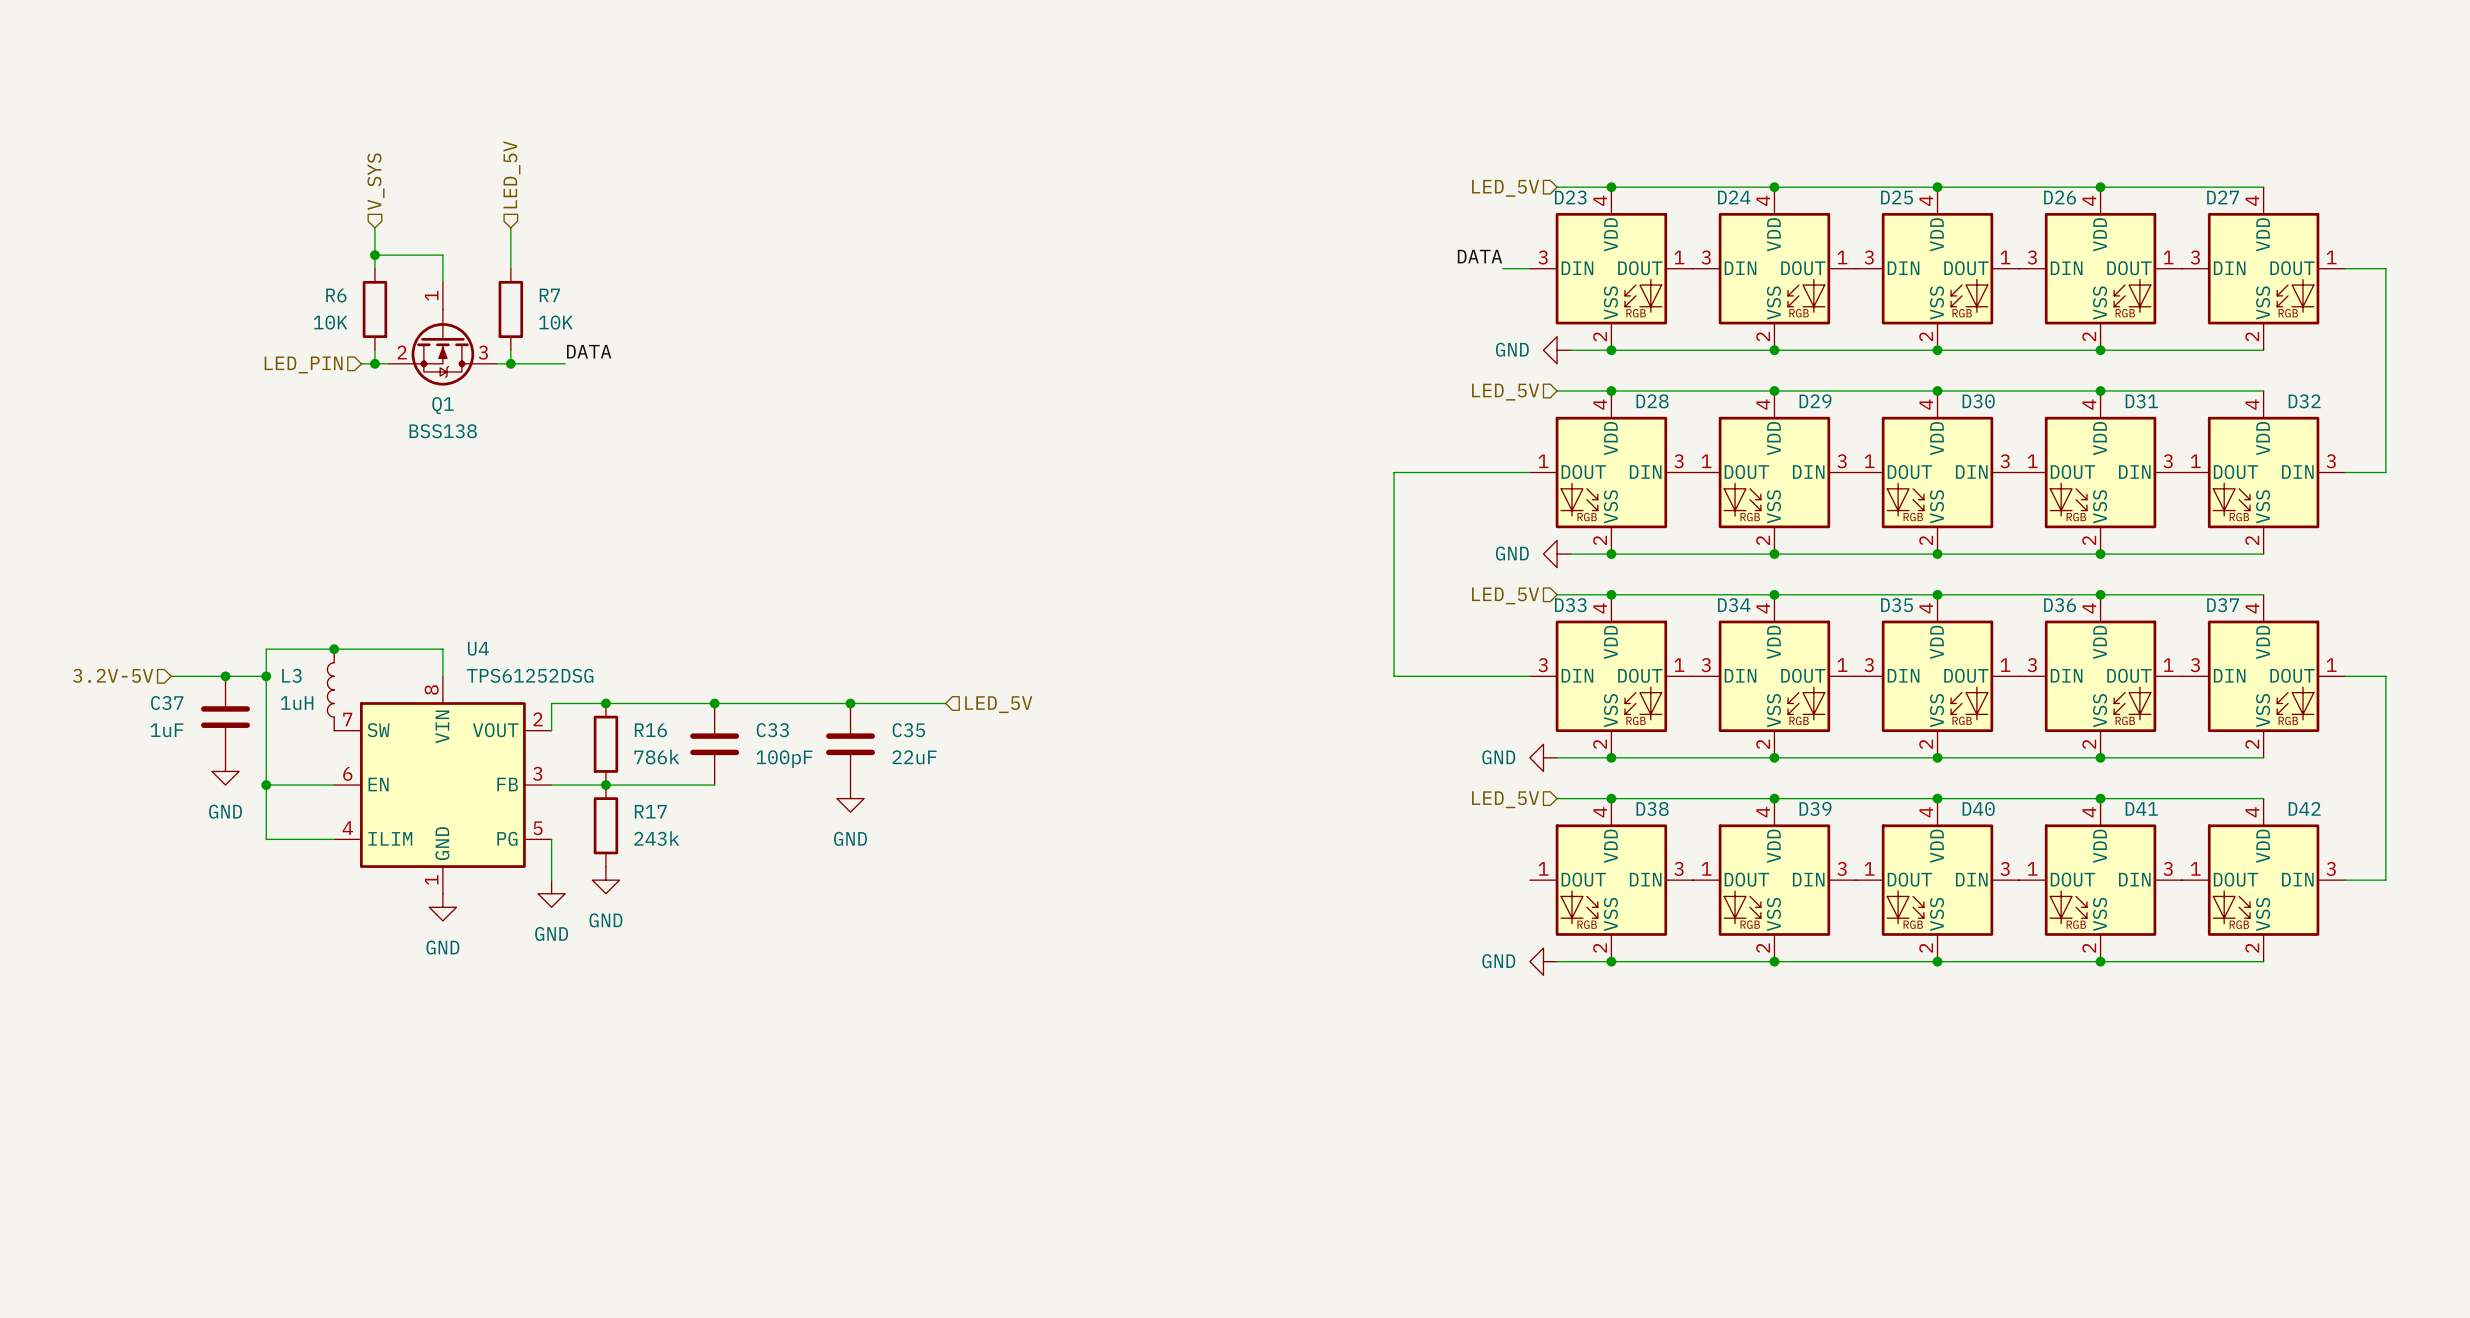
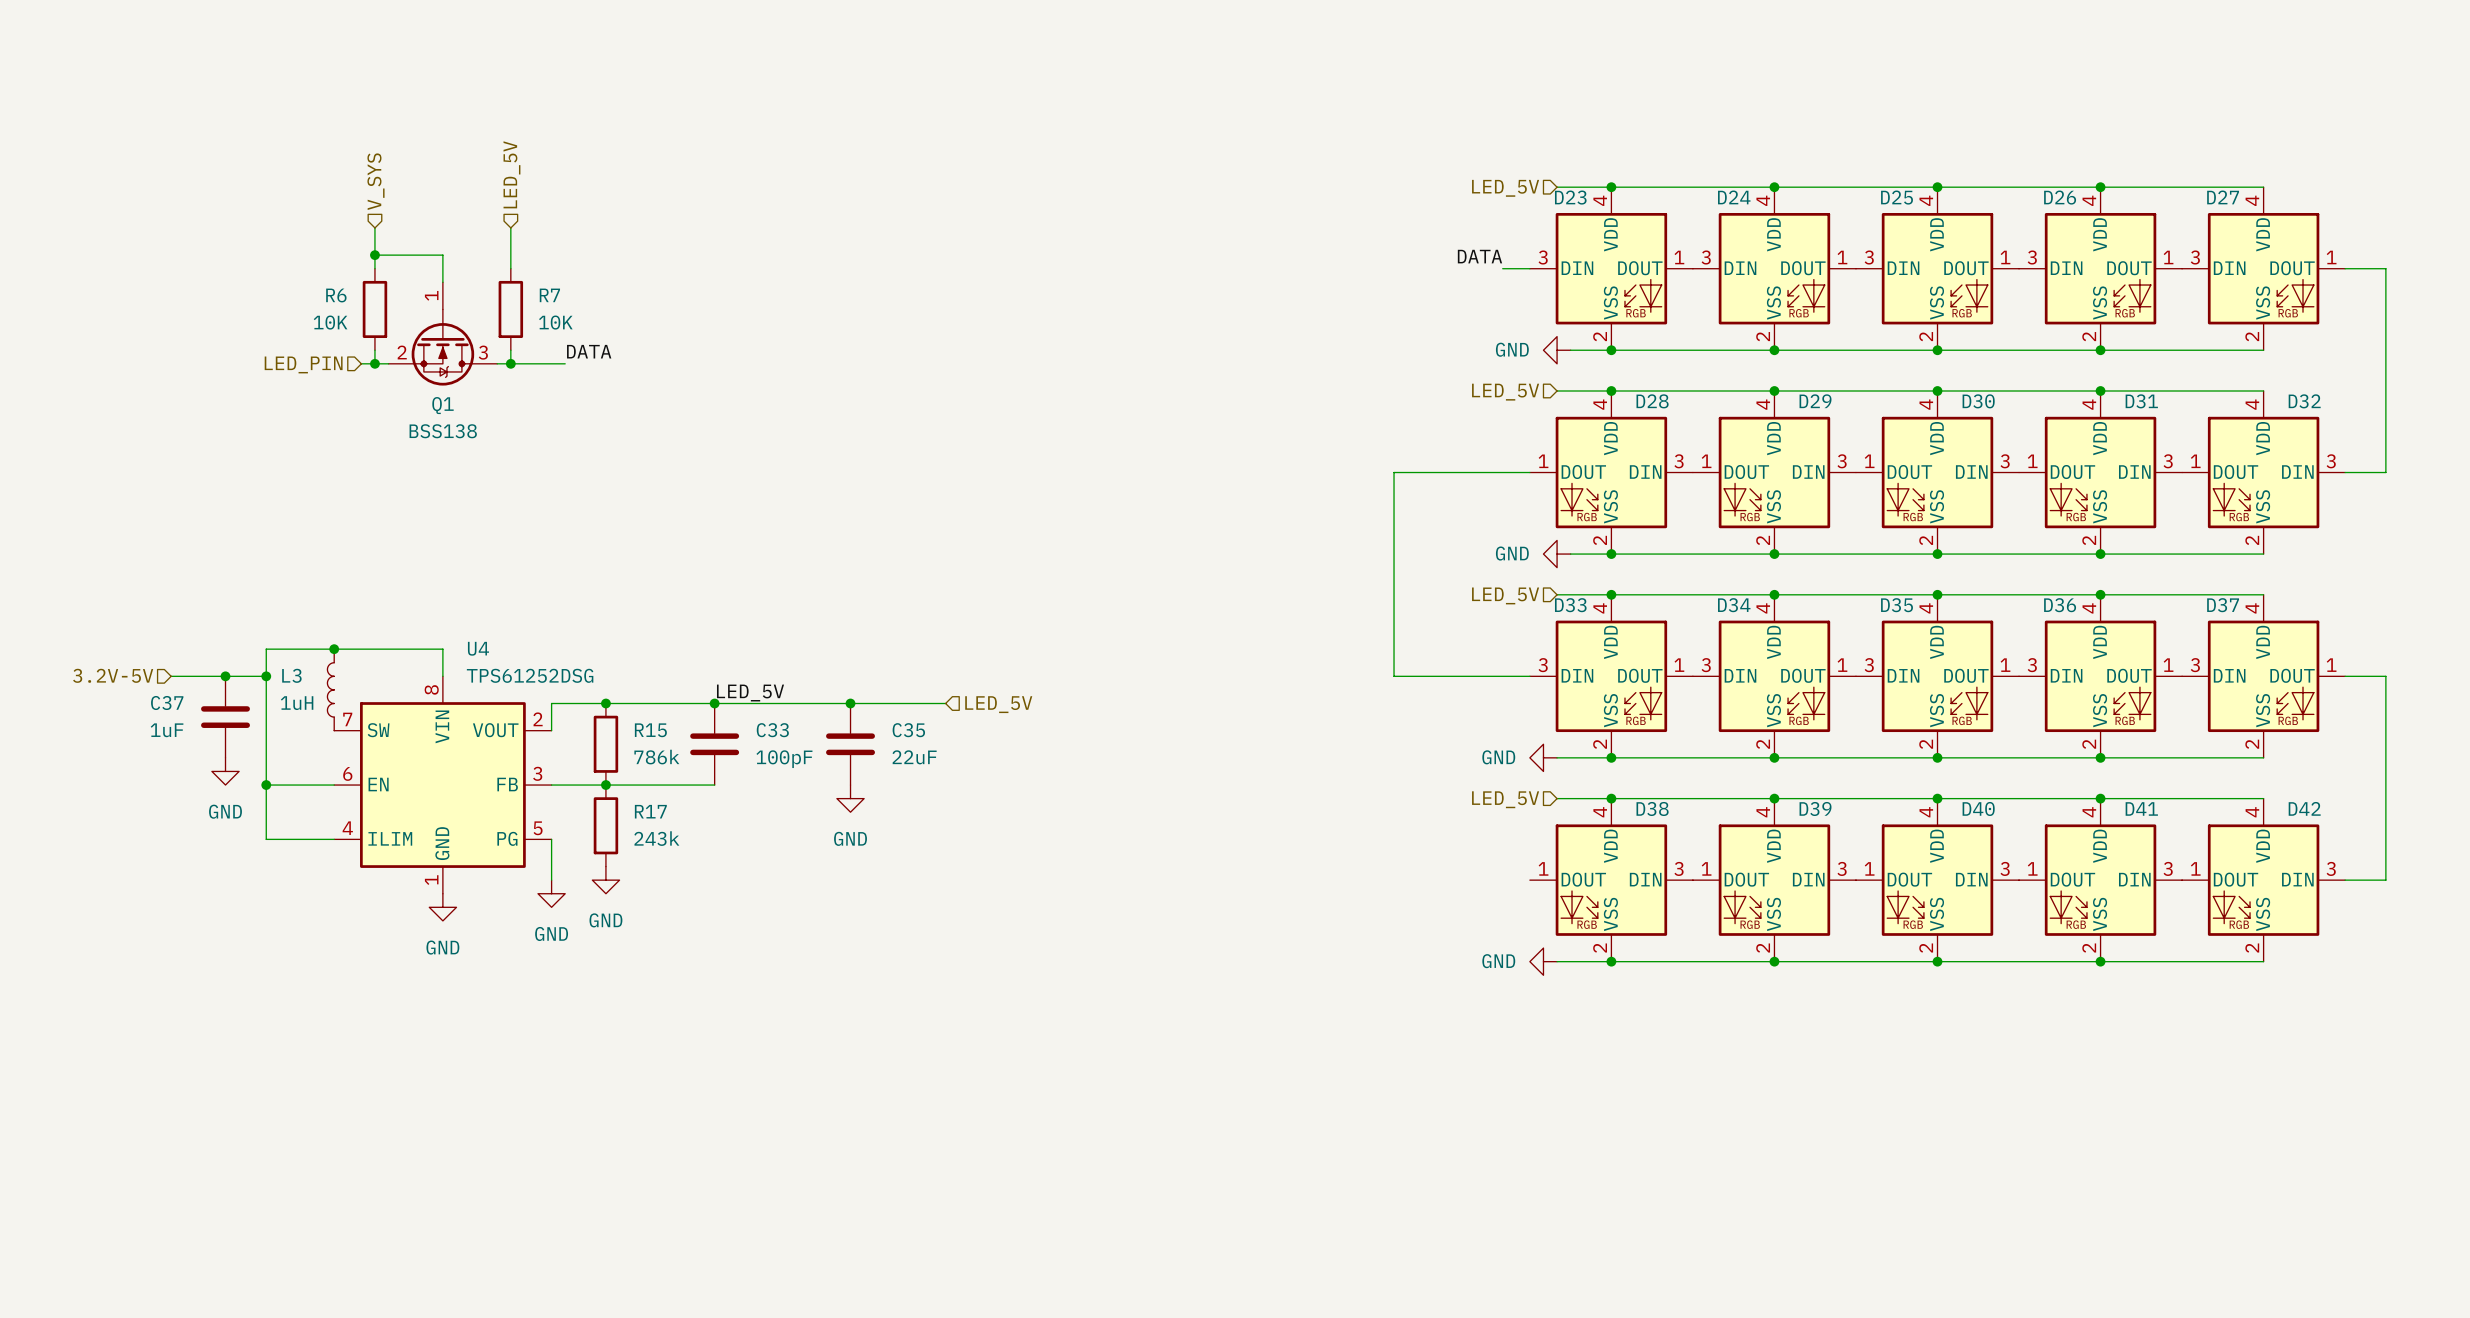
label: none -> LED_5V (750, 693)
R16 name: R16 (650, 730) -> R15 (650, 730)

